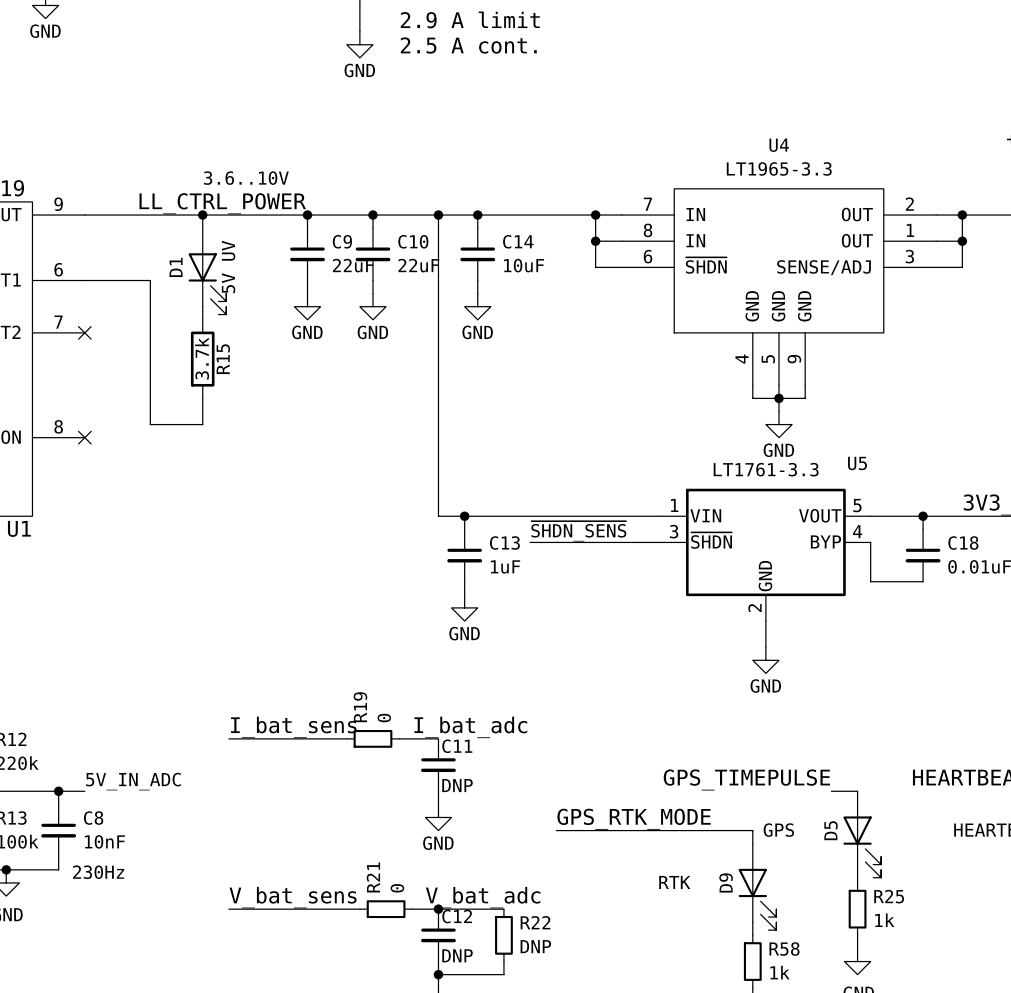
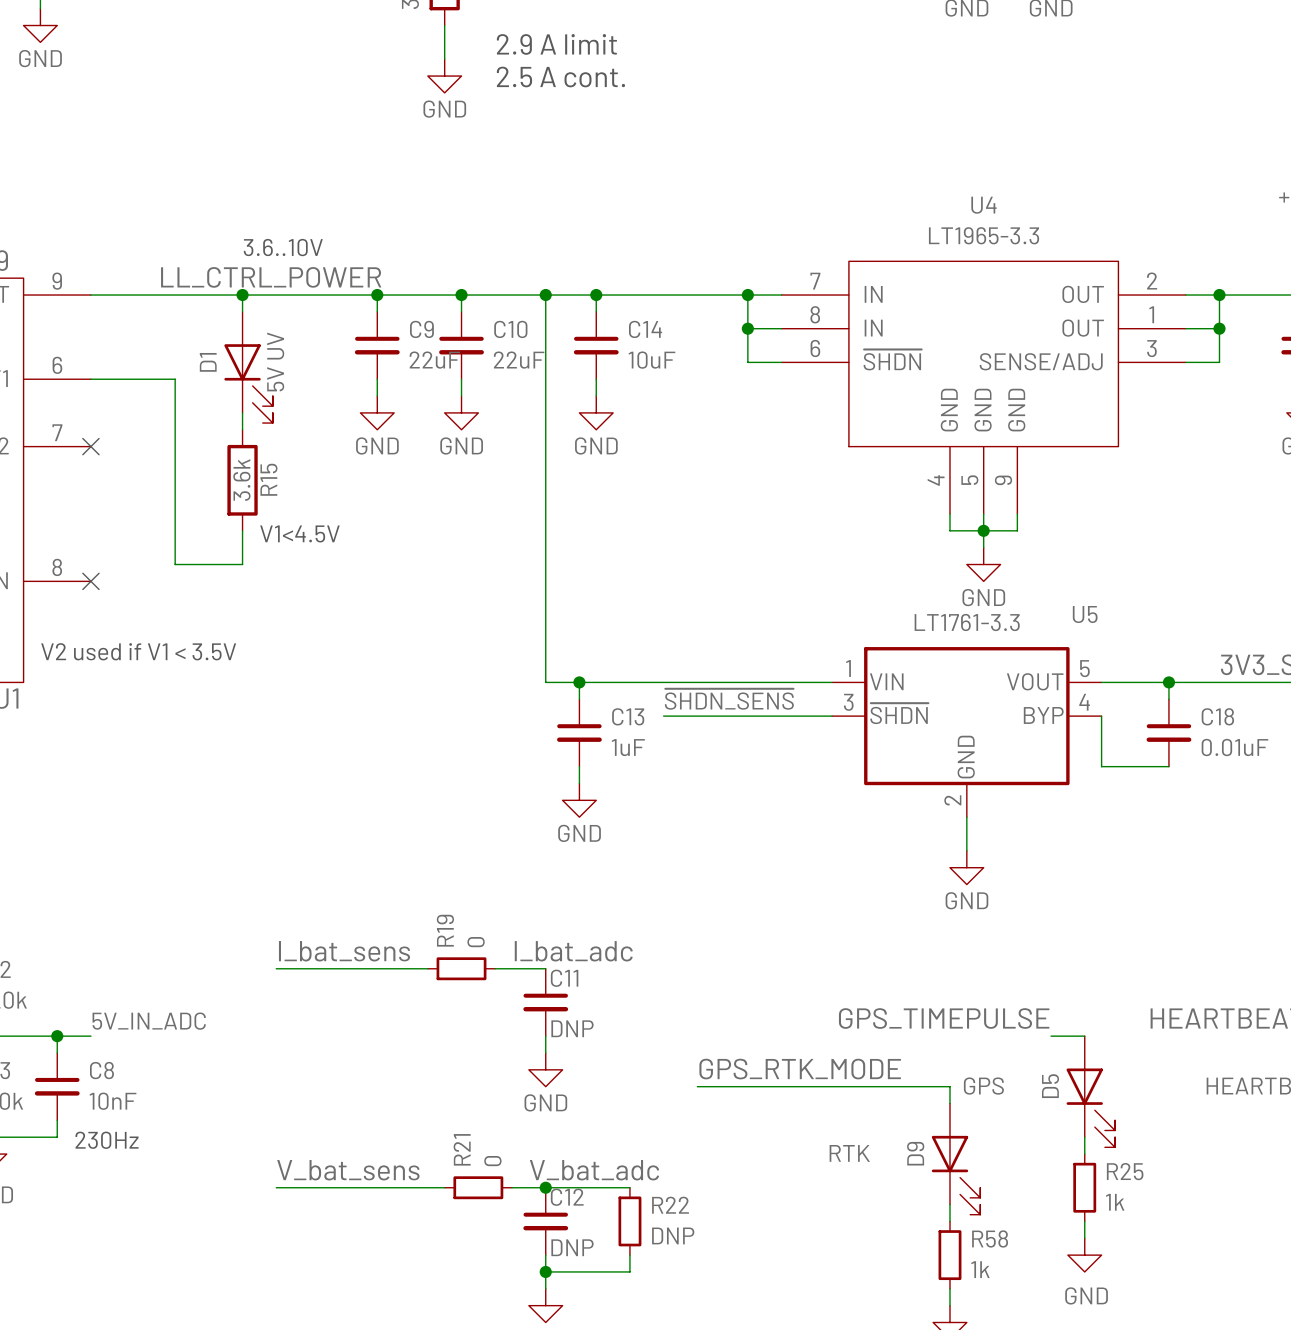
R15 value: 3.7k (202, 358) -> 3.6k (241, 480)
text: none -> V1<4.5V (299, 533)
text: none -> V2 used if V1 < 3.5V (138, 651)

